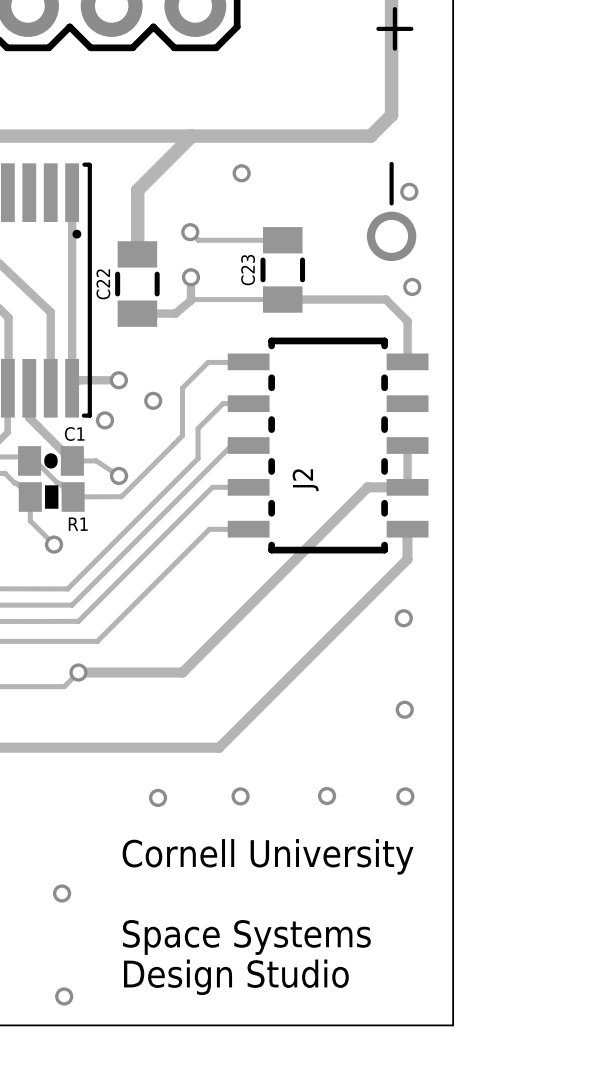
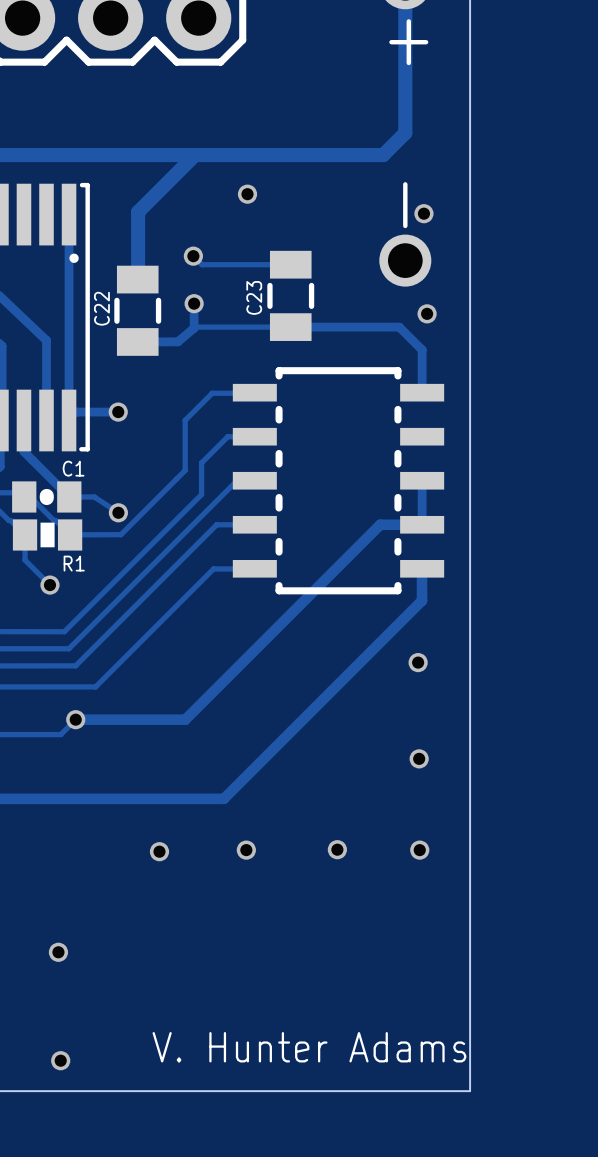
via: (153, 400) -> none
via: (104, 420) -> none
J2 name: J2 (305, 480) -> none
text: Cornell University (268, 856) -> none
text: Space Systems (246, 937) -> none
text: Design Studio (236, 977) -> none
text: none -> V. Hunter Adams (309, 1047)

